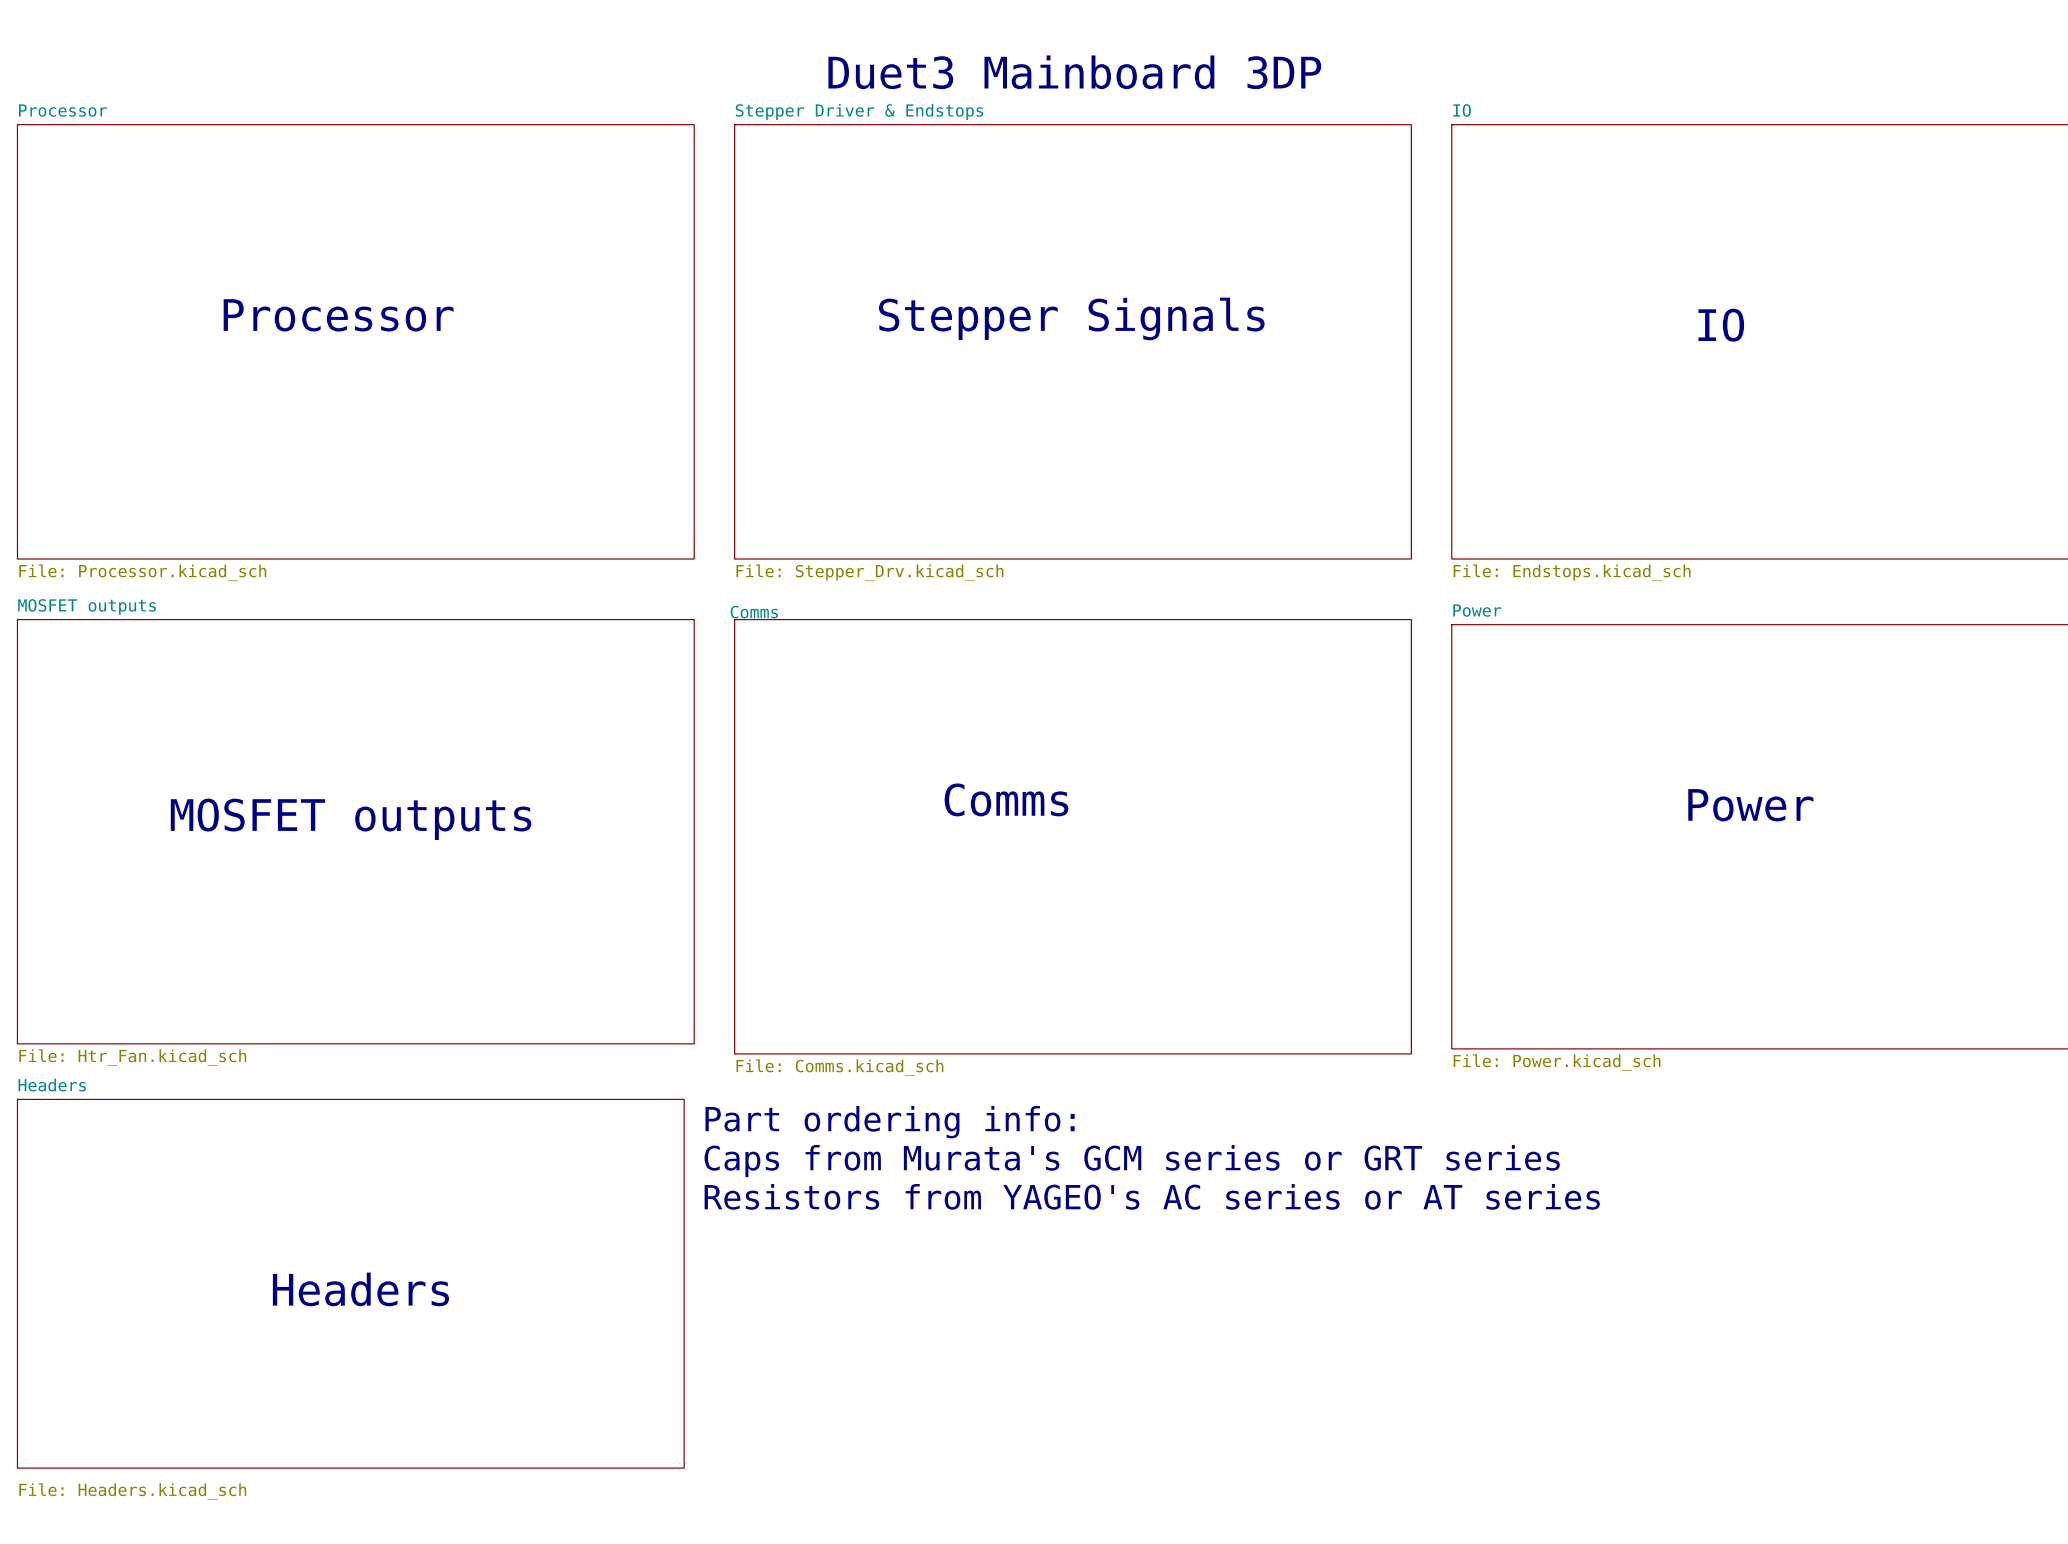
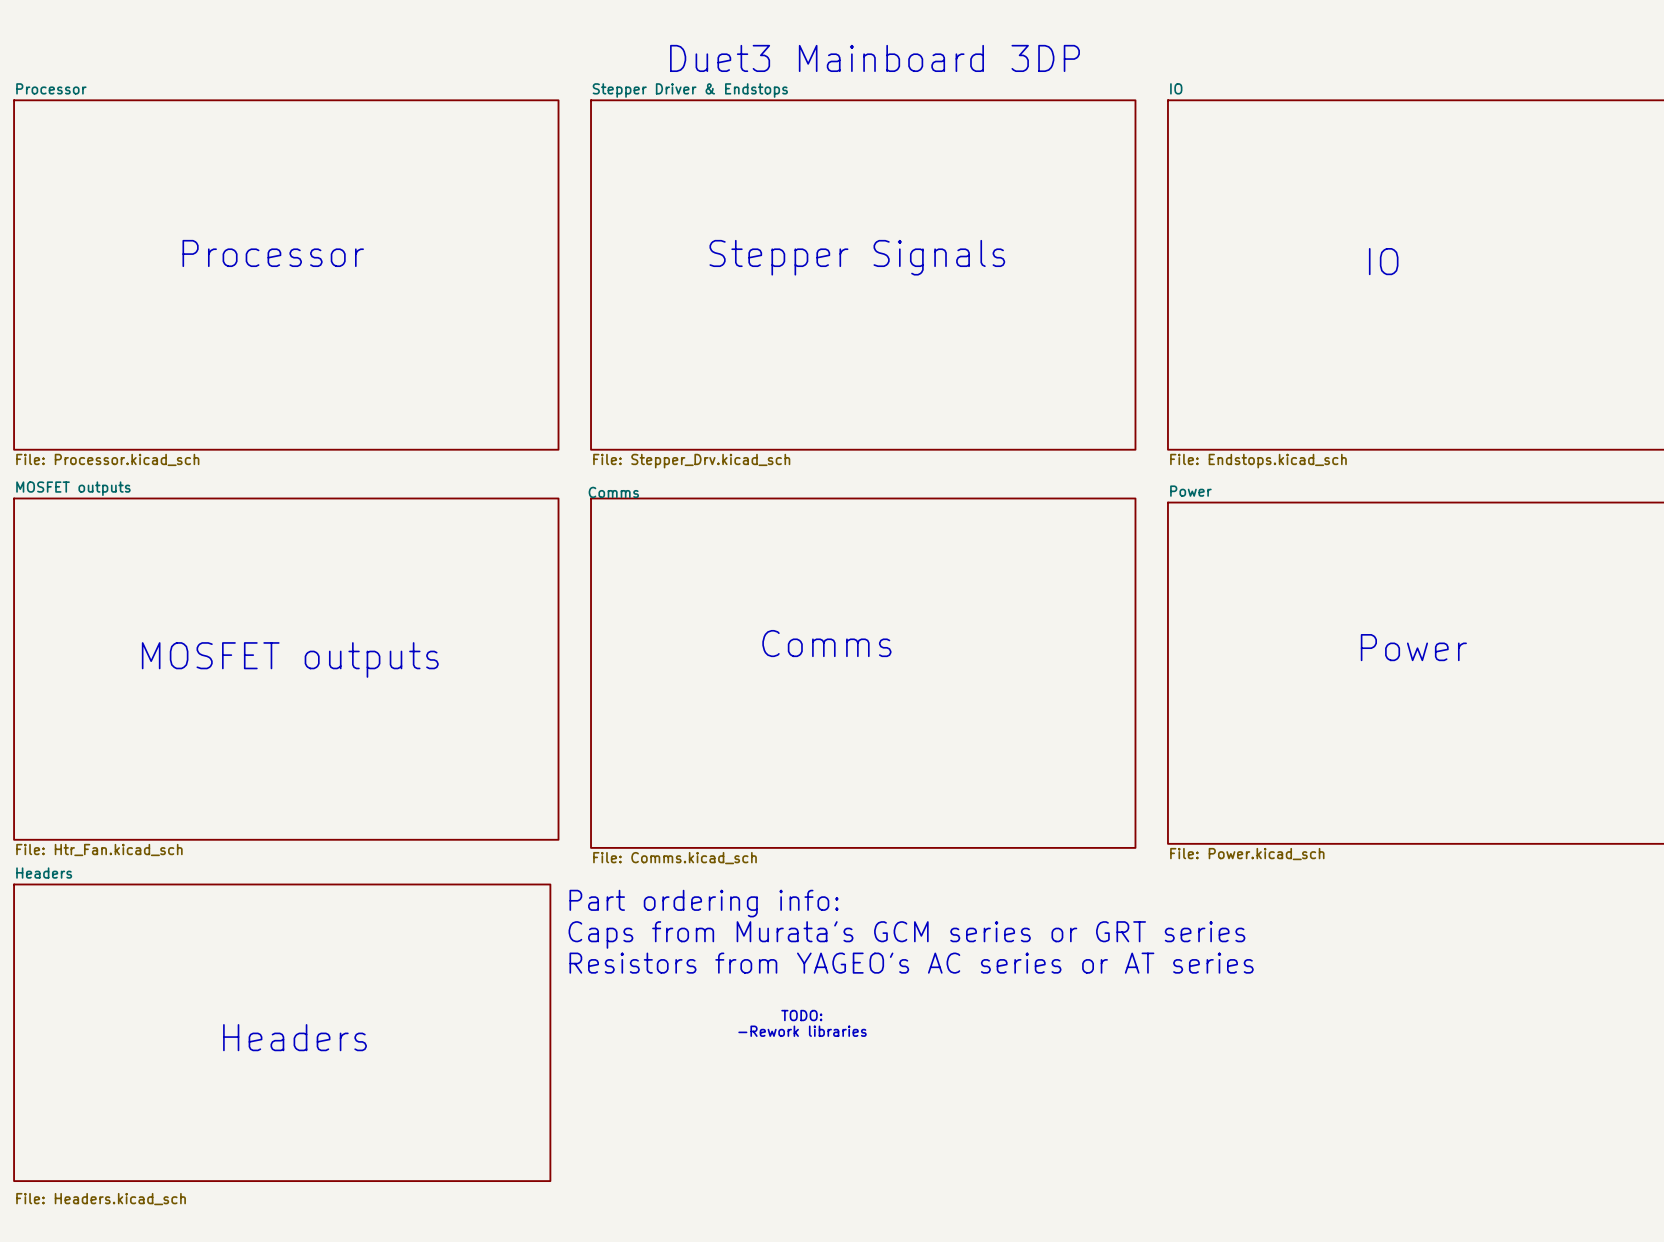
text: none -> TODO: (801, 1015)
text: none -> -Rework libraries (802, 1031)

